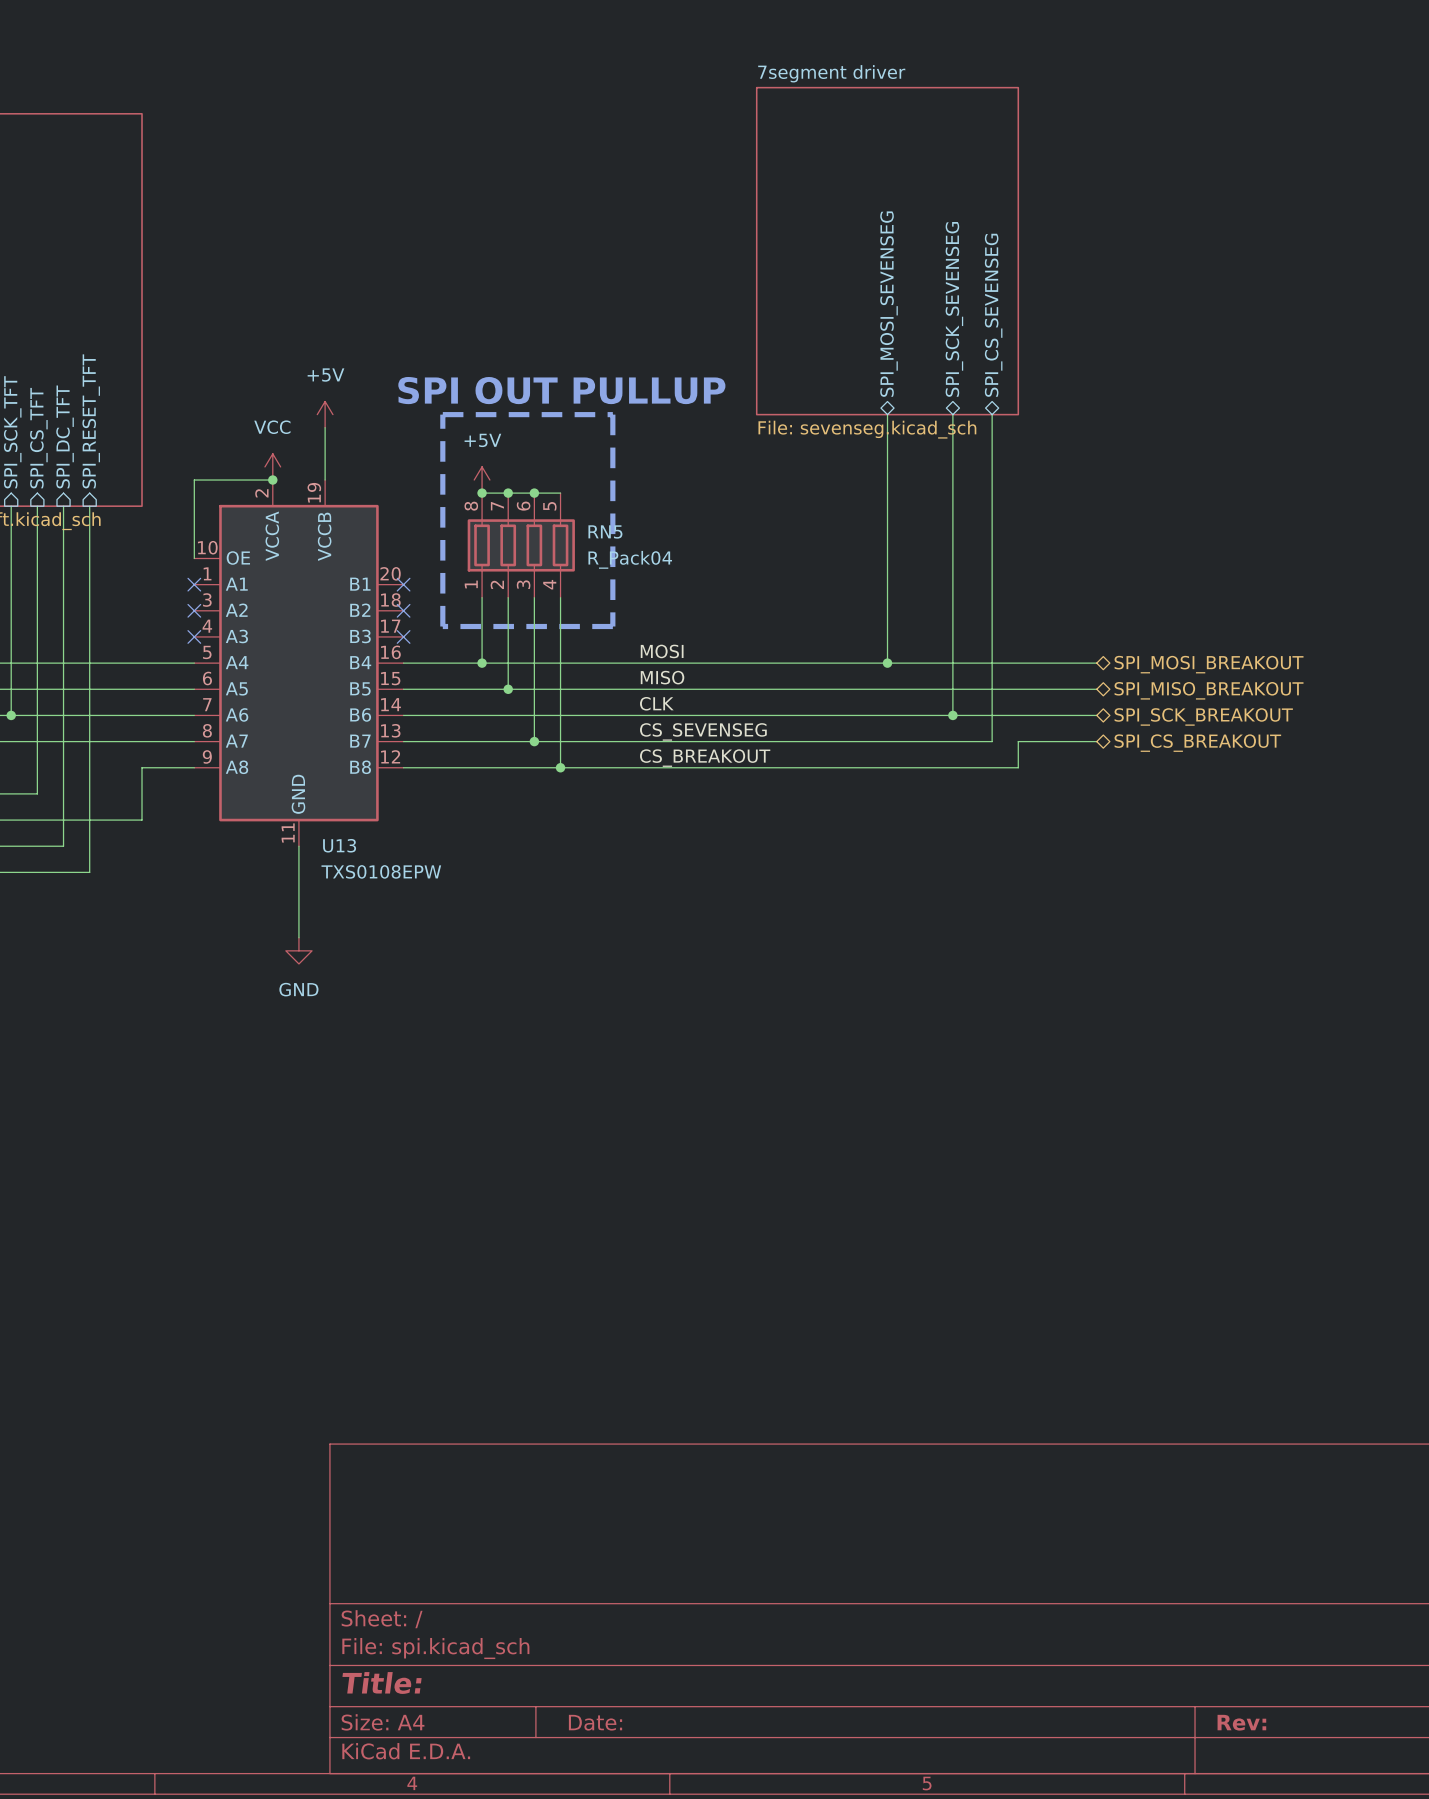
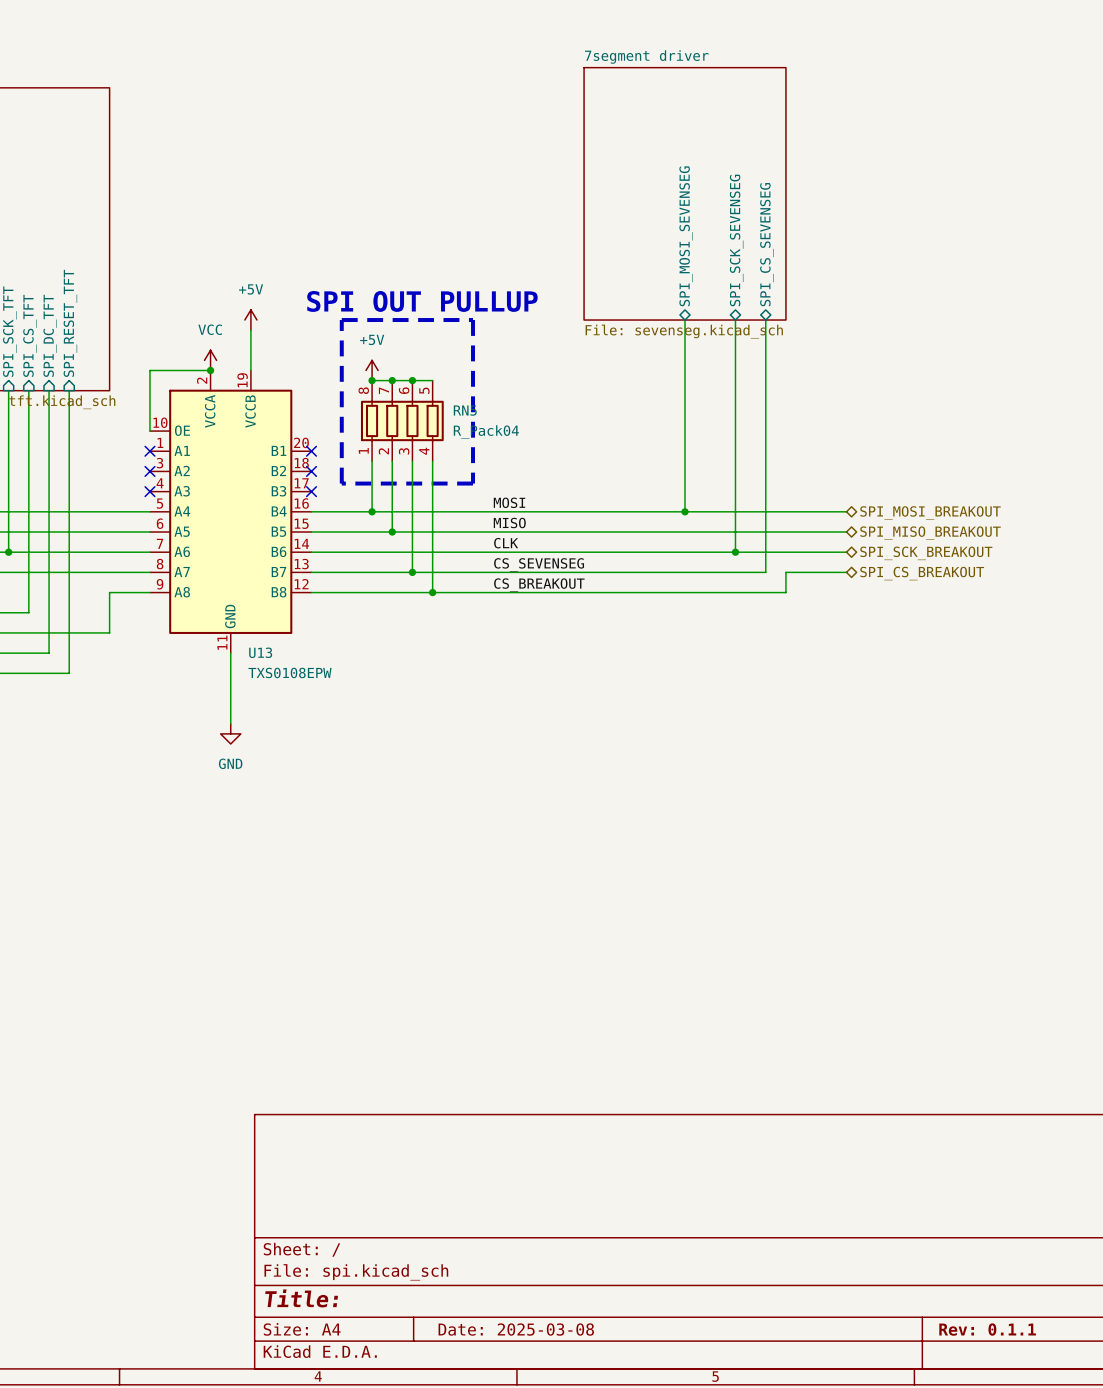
title block: Date: (595, 1722) -> Date: 2025-03-08 (516, 1329)
title block: Rev: (1241, 1722) -> Rev: 0.1.1 (987, 1329)

